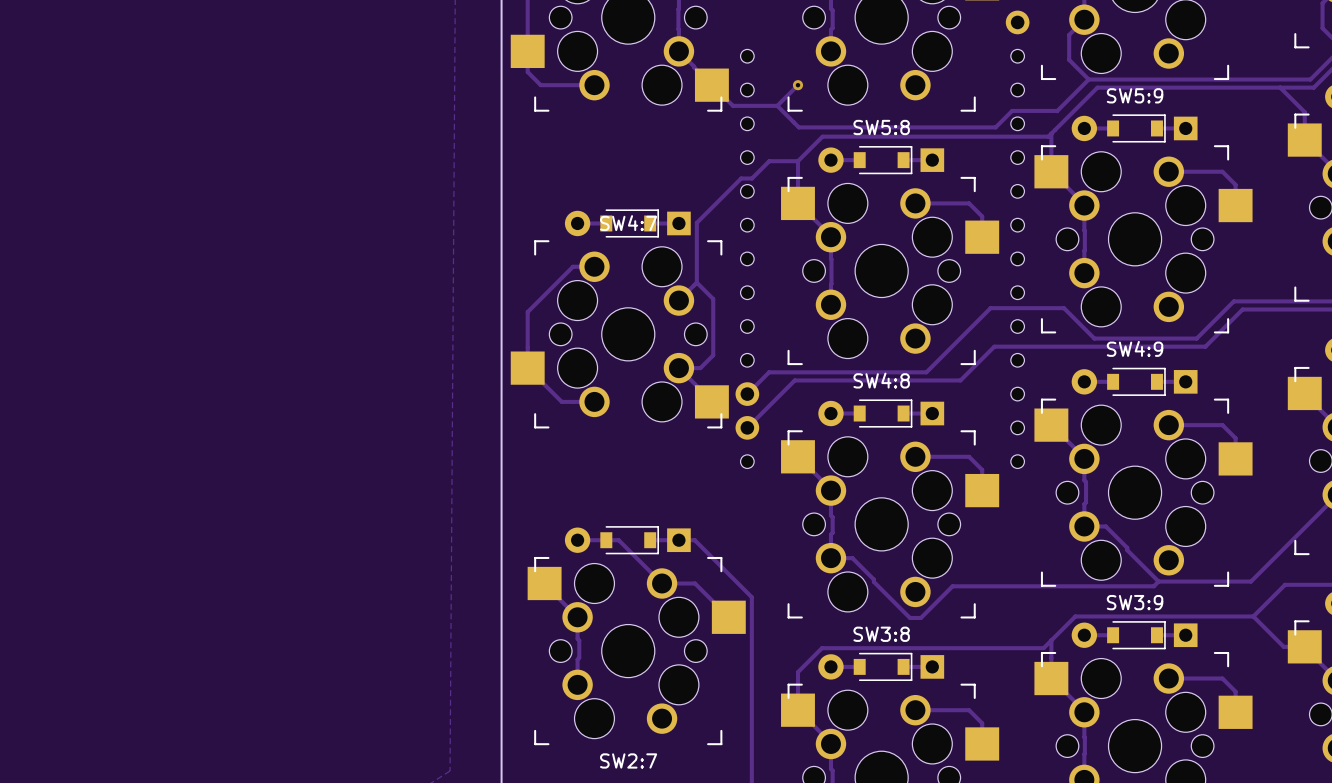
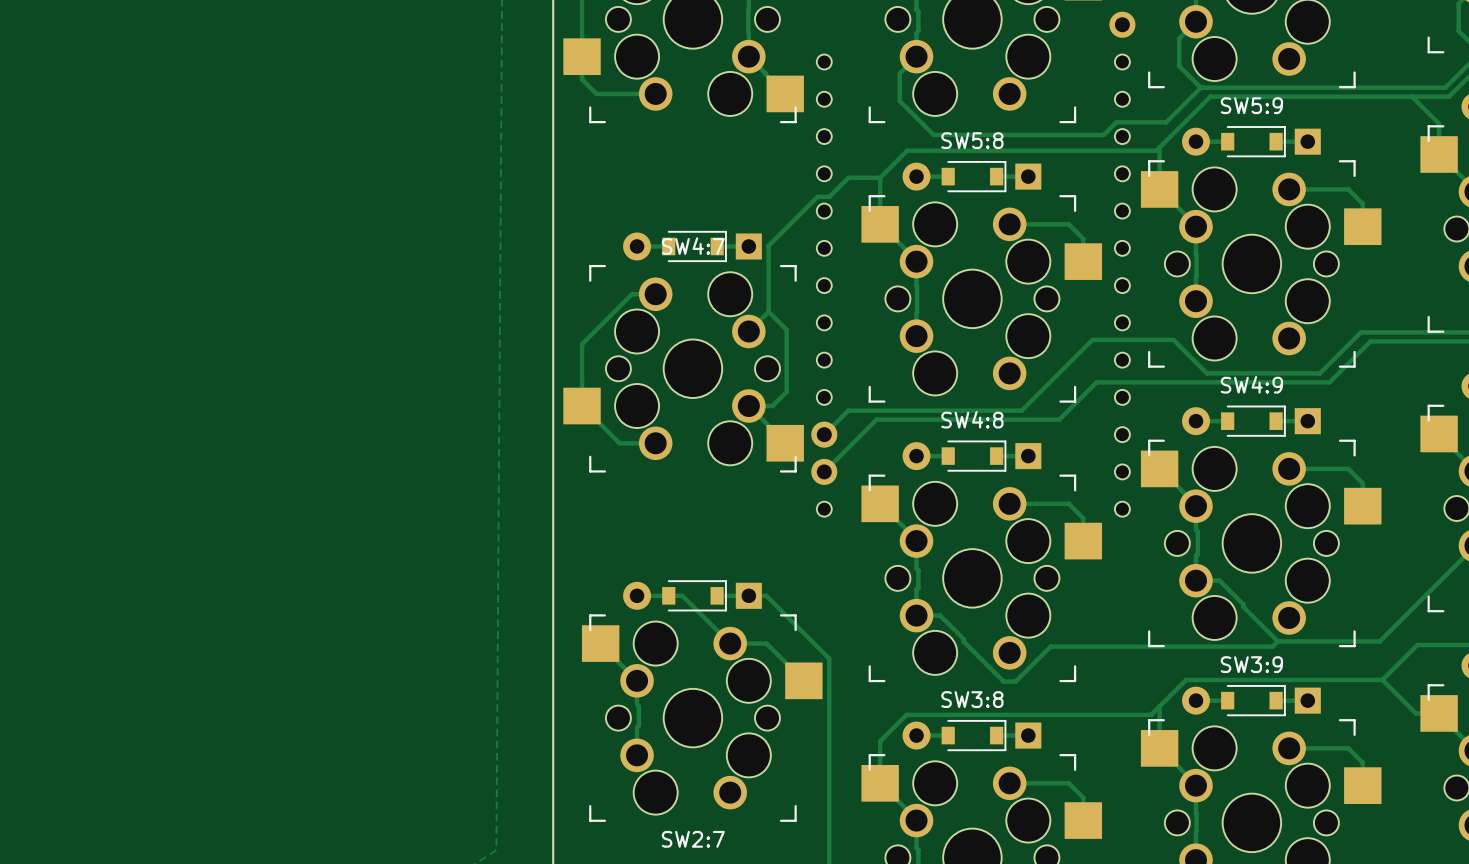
track: (711, 85) (732, 105) (777, 105) -> none
track: (797, 85) (777, 105) -> none
via: (797, 85) -> none
track: (777, 105) (798, 127) (995, 127) (1000, 122) -> (916, 56) (899, 73) (899, 101) (933, 134) (1103, 134)

